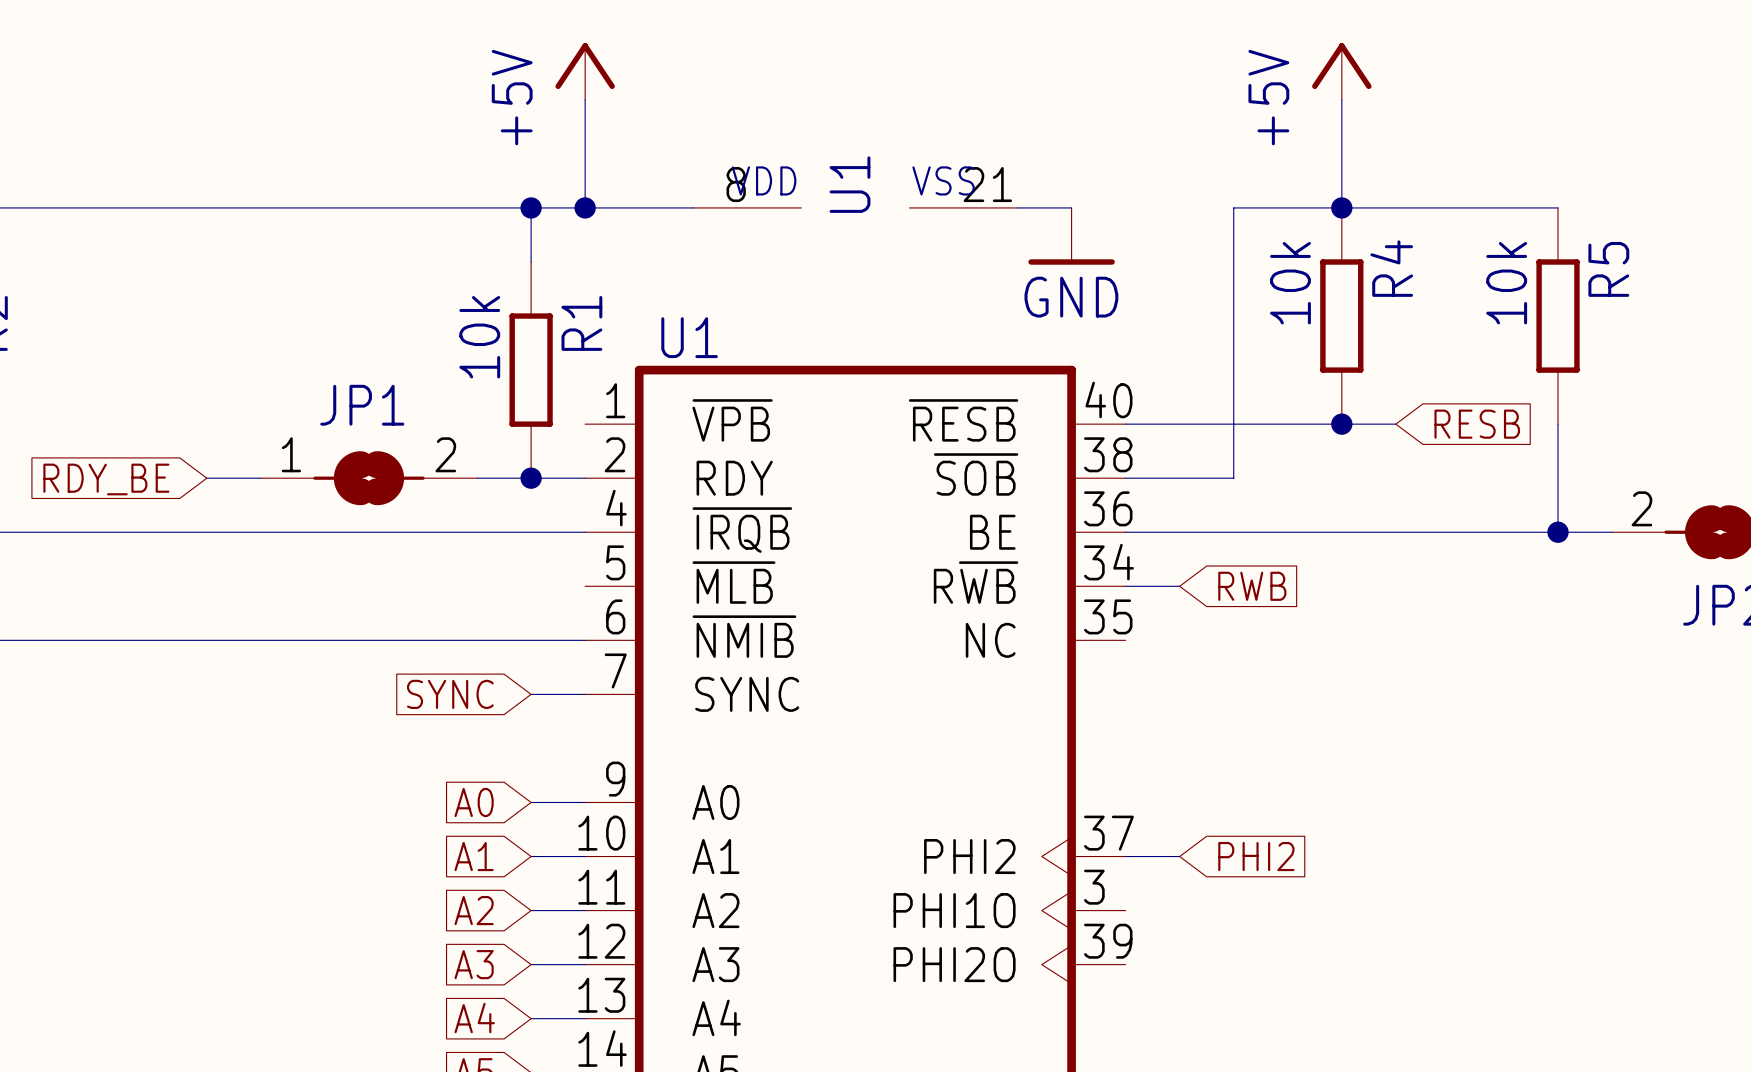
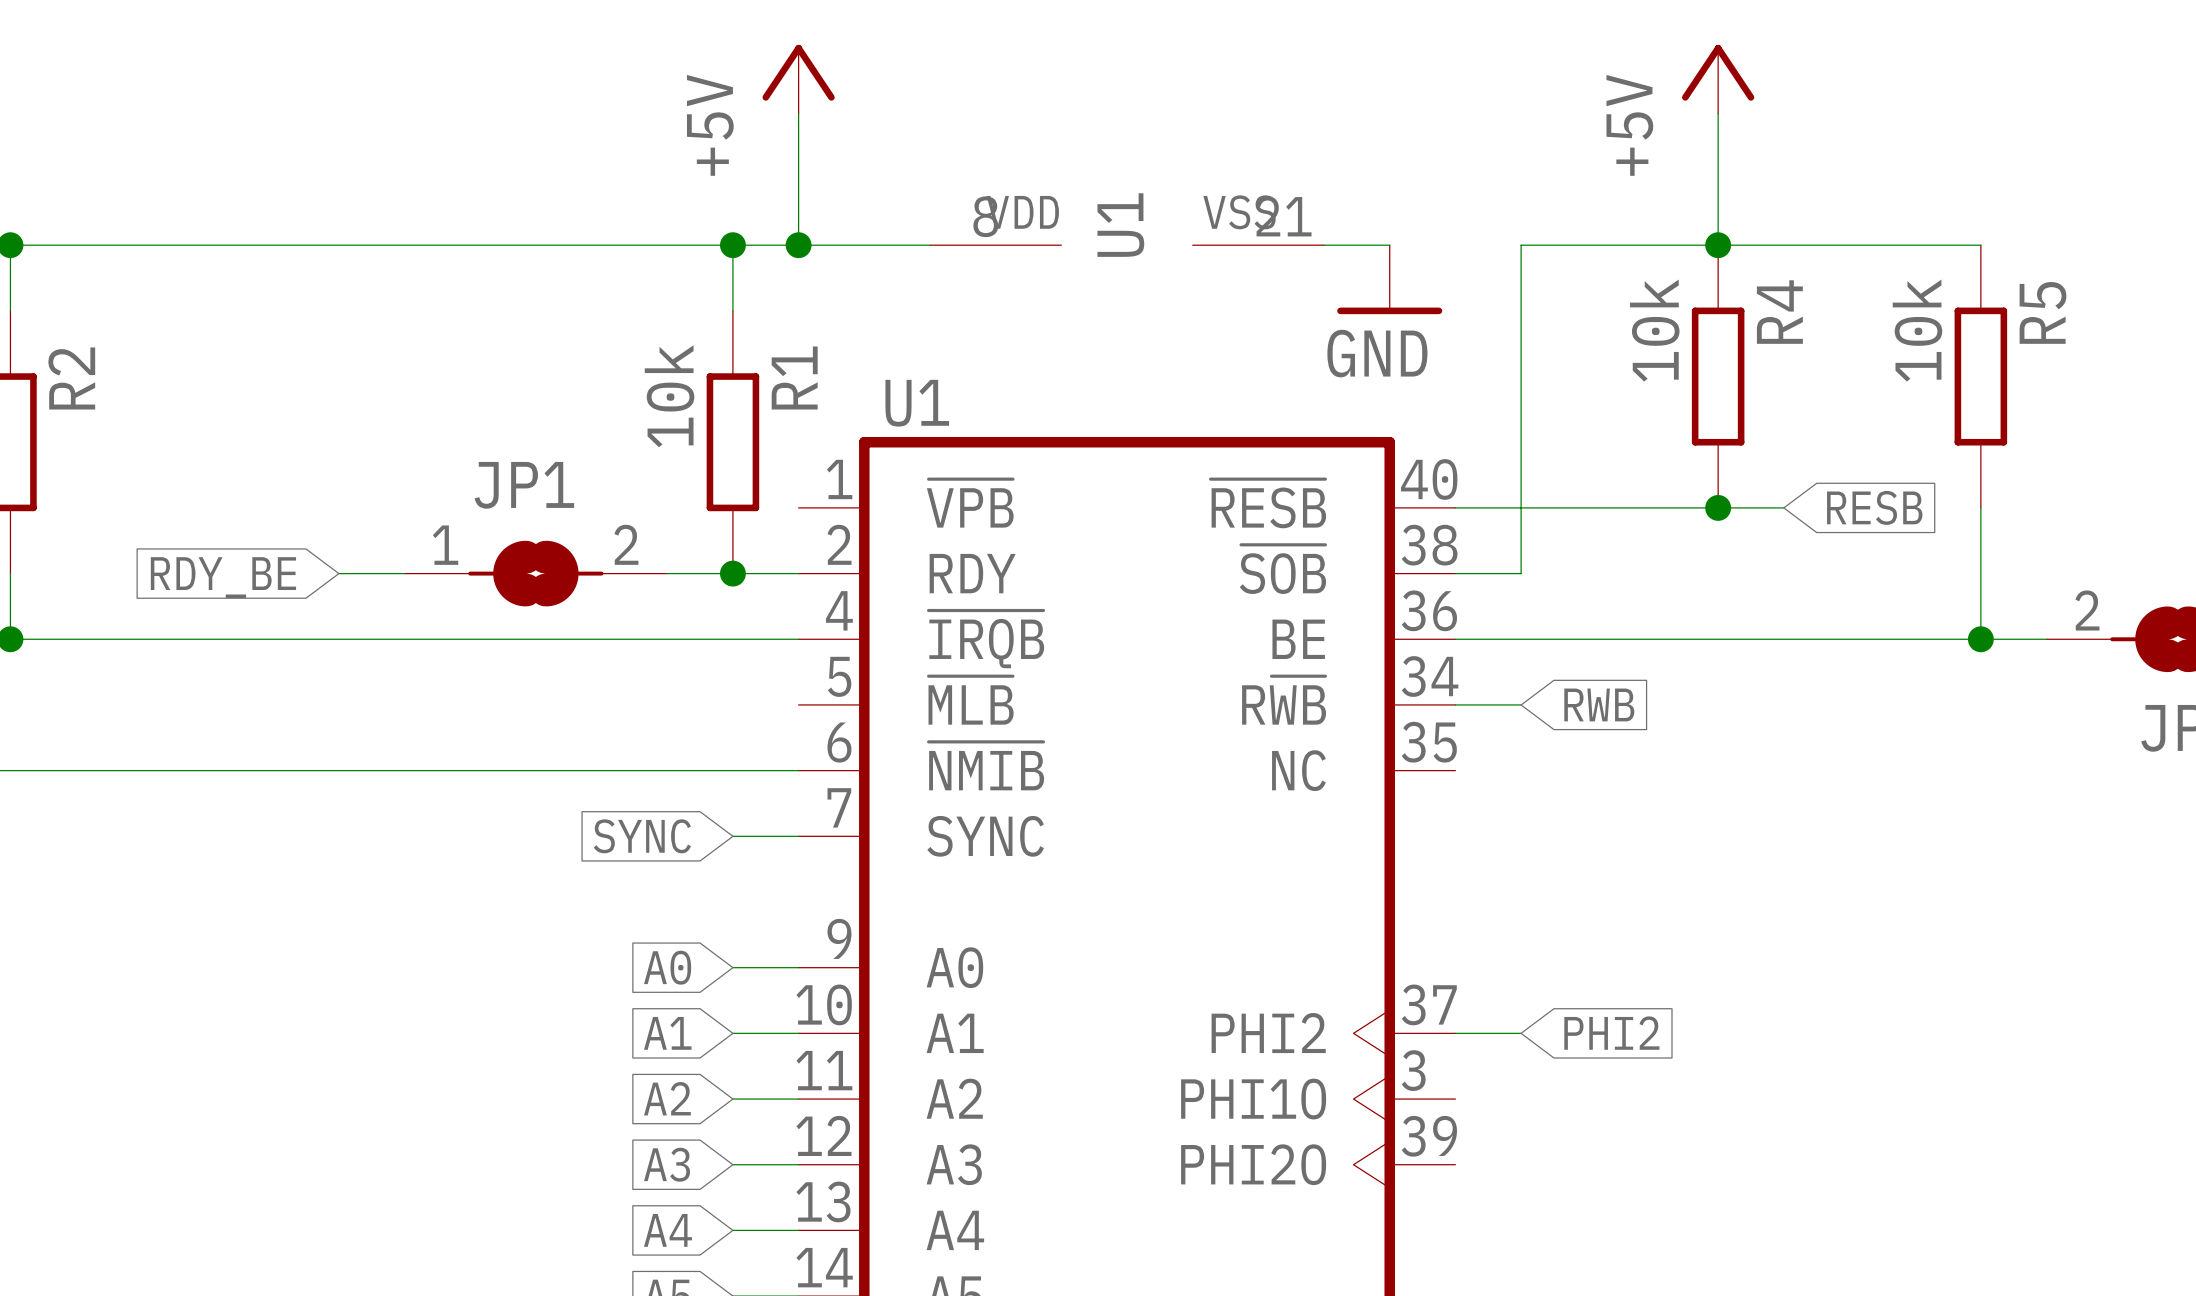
wire: (1233, 207) (1233, 478) (1179, 478) -> (1586, 245) (1521, 245) (1521, 573)

